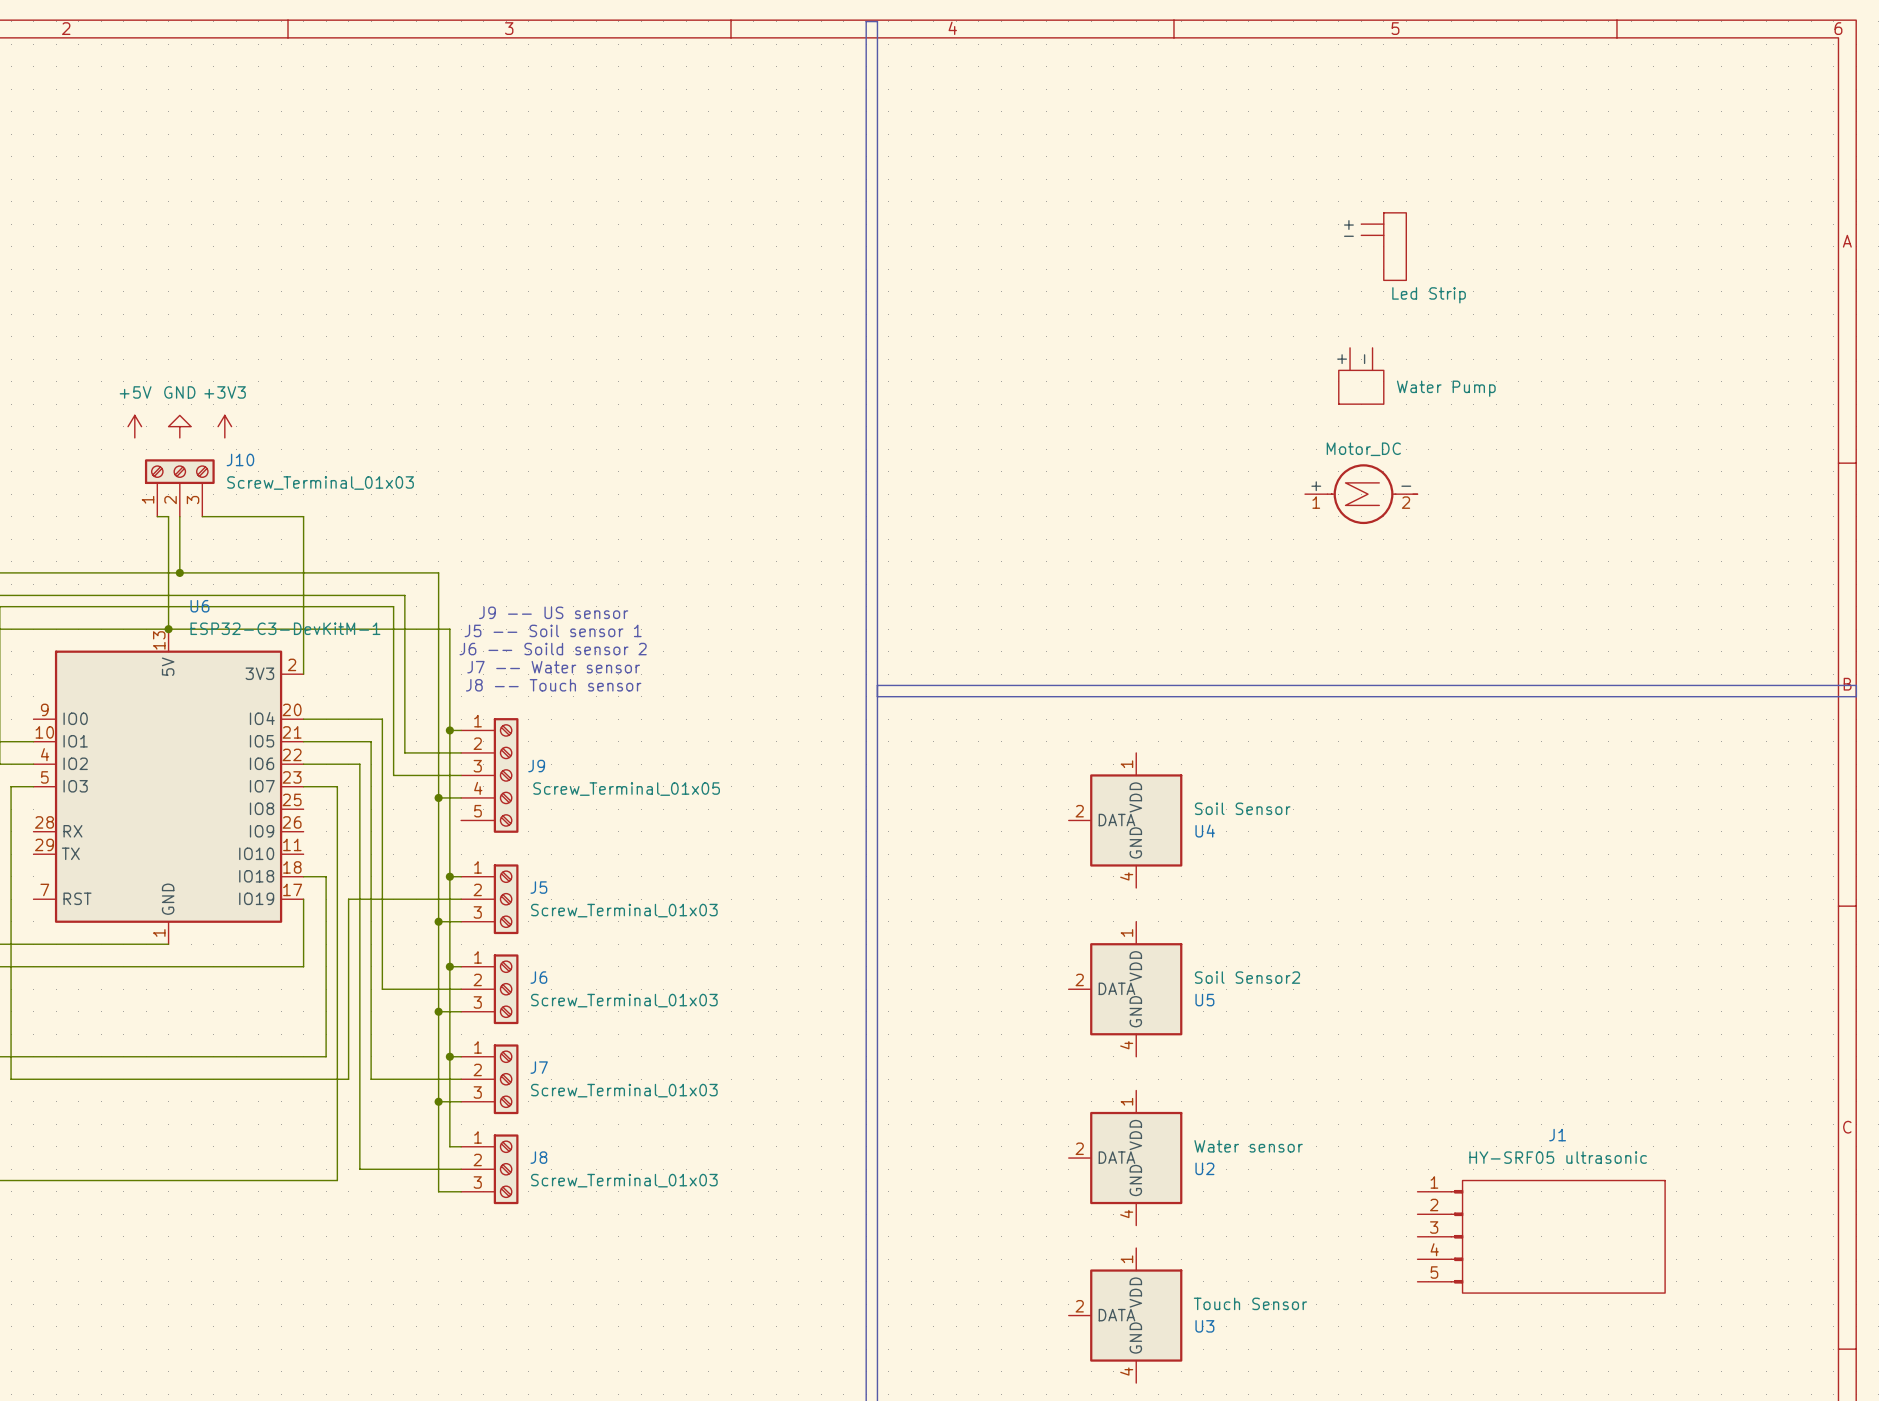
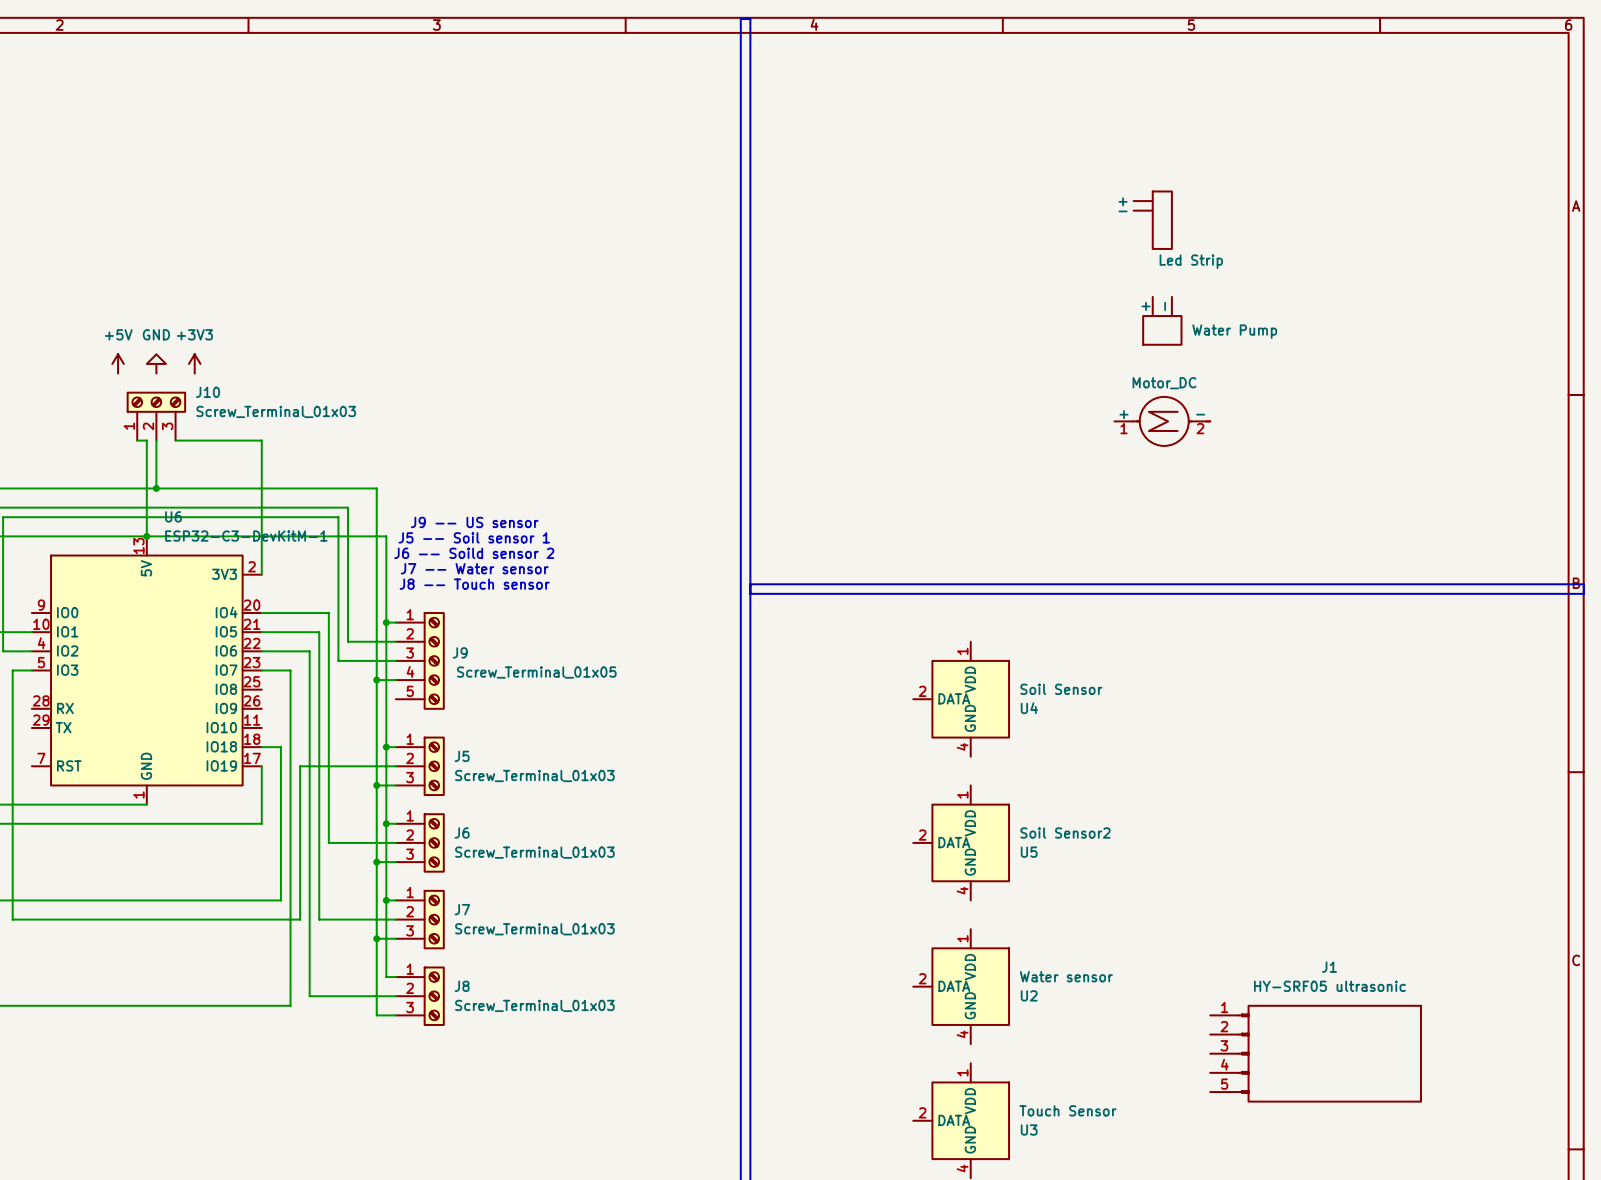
part position: (1383, 246) -> (1152, 220)

